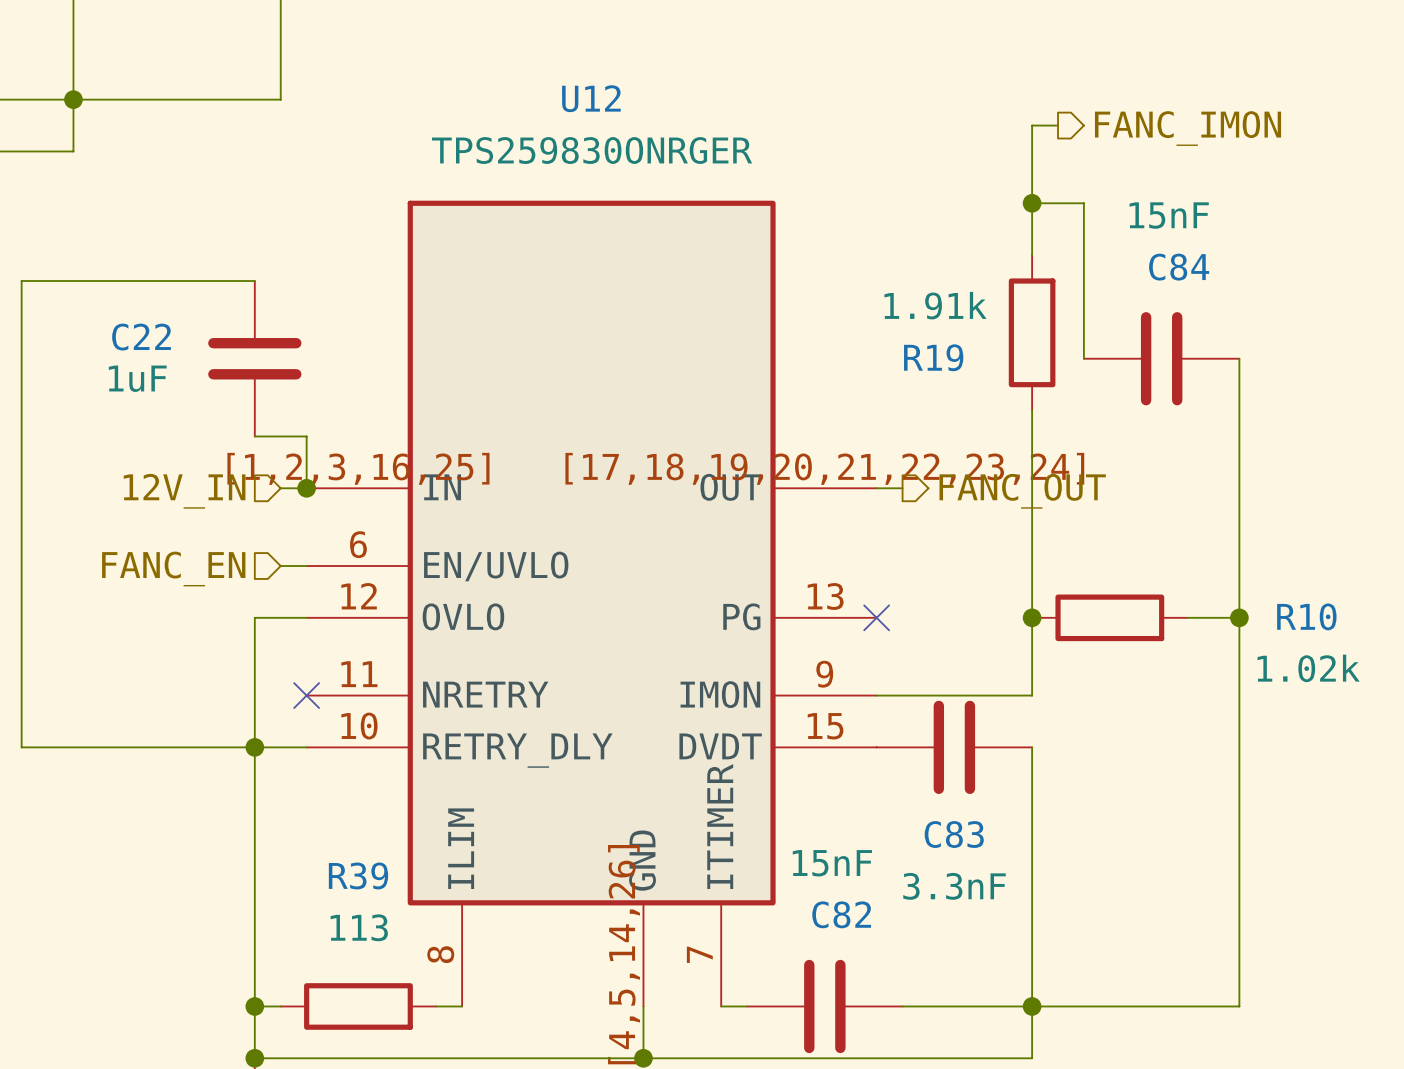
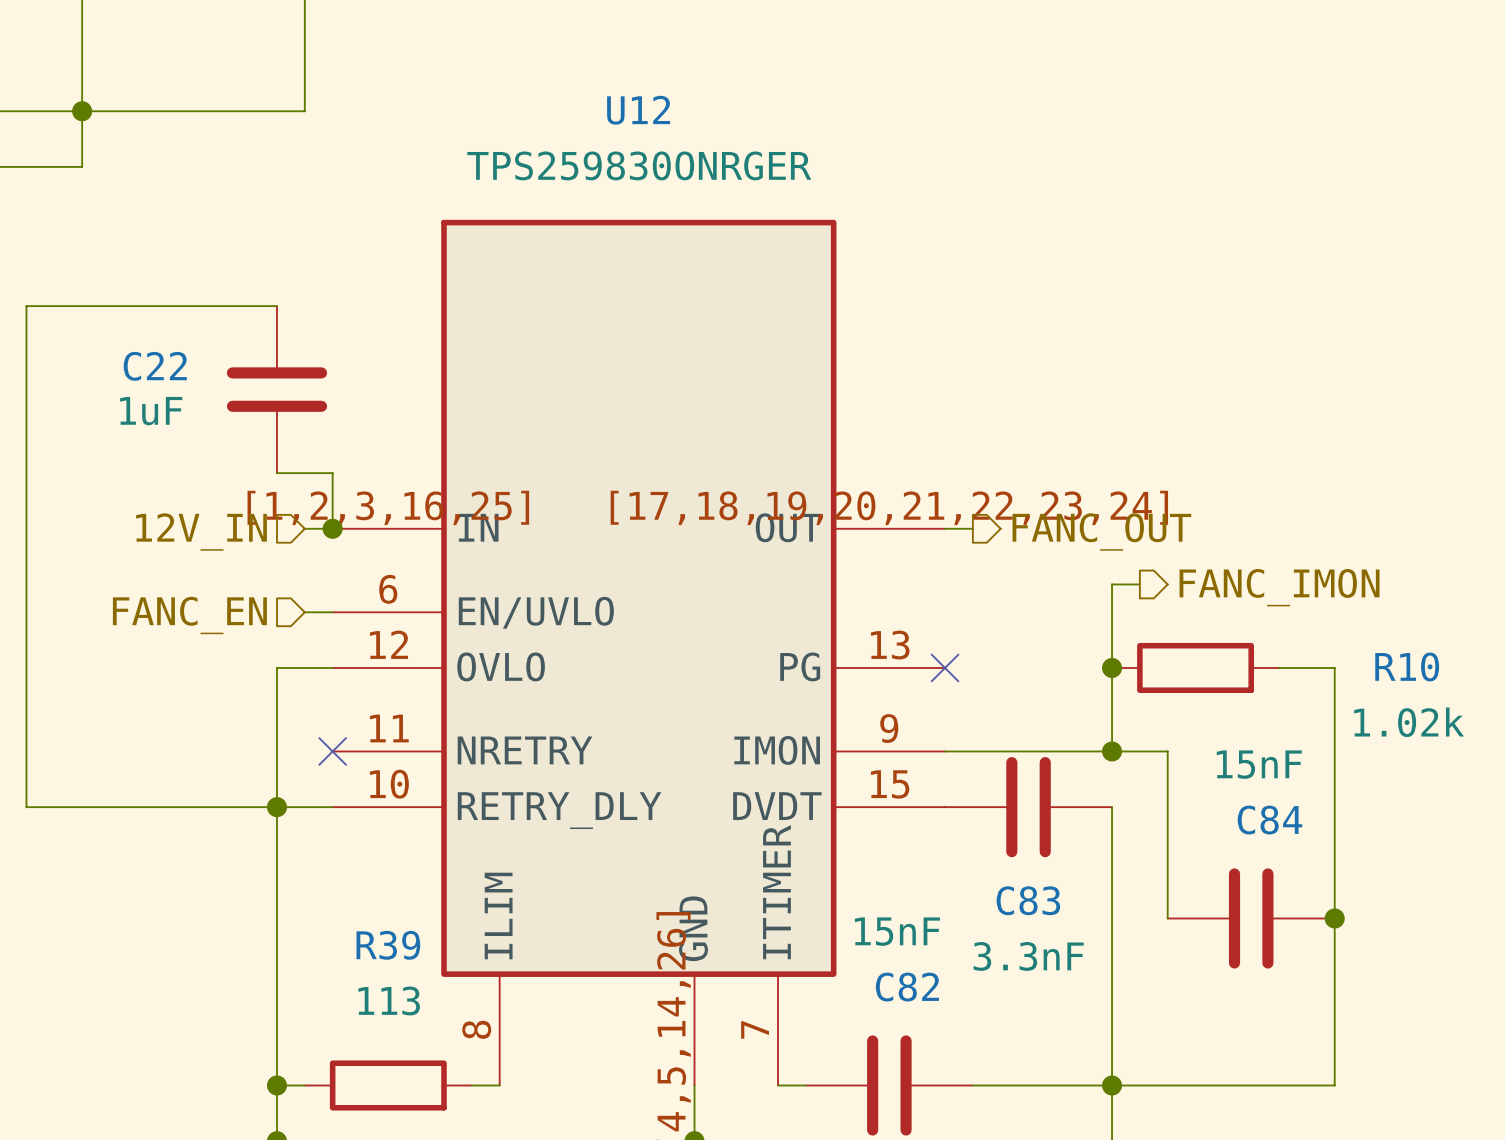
wire: (1058, 125) (1032, 125) (1032, 255) -> none
hierarchical label position: FANC_IMON (1188, 128) -> FANC_IMON (1279, 587)
wire: (1032, 203) (1083, 203) (1083, 358) -> (1112, 751) (1167, 751) (1167, 918)
junction: (1032, 203) -> none
R19: 1.91k (1032, 332) -> none
C84 position: (1161, 358) -> (1251, 918)
wire: (1239, 358) (1239, 617) -> none
wire: (1032, 410) (1032, 540) -> (1139, 584) (1112, 584)
junction: (1239, 617) -> none
junction: none -> (1112, 751)
junction: none -> (1334, 918)

